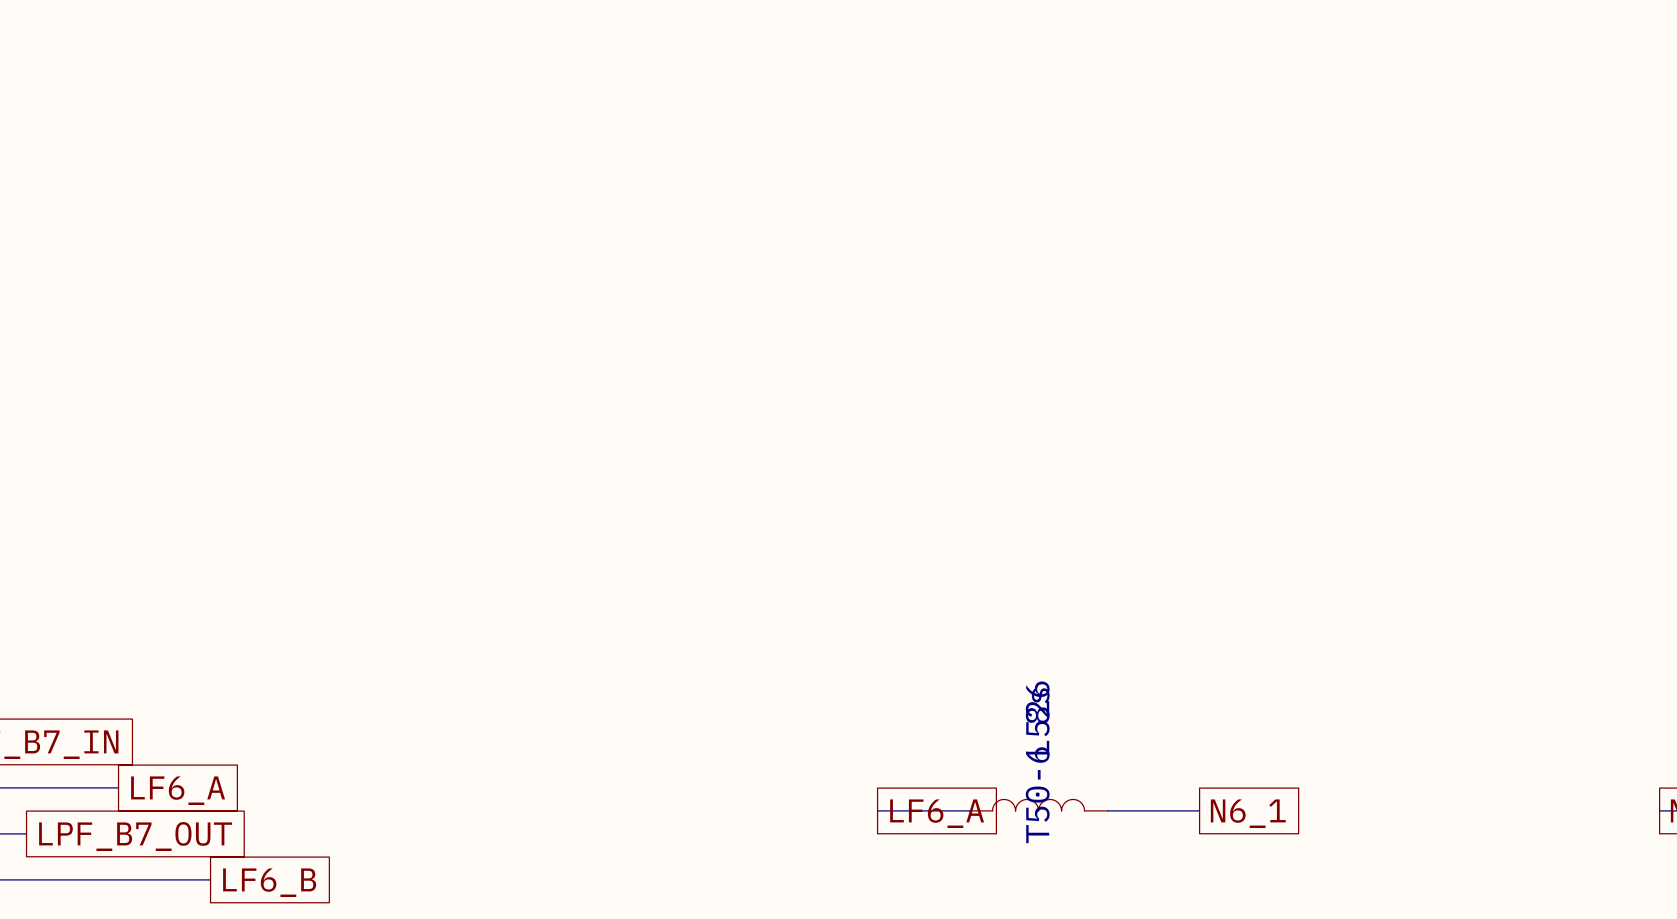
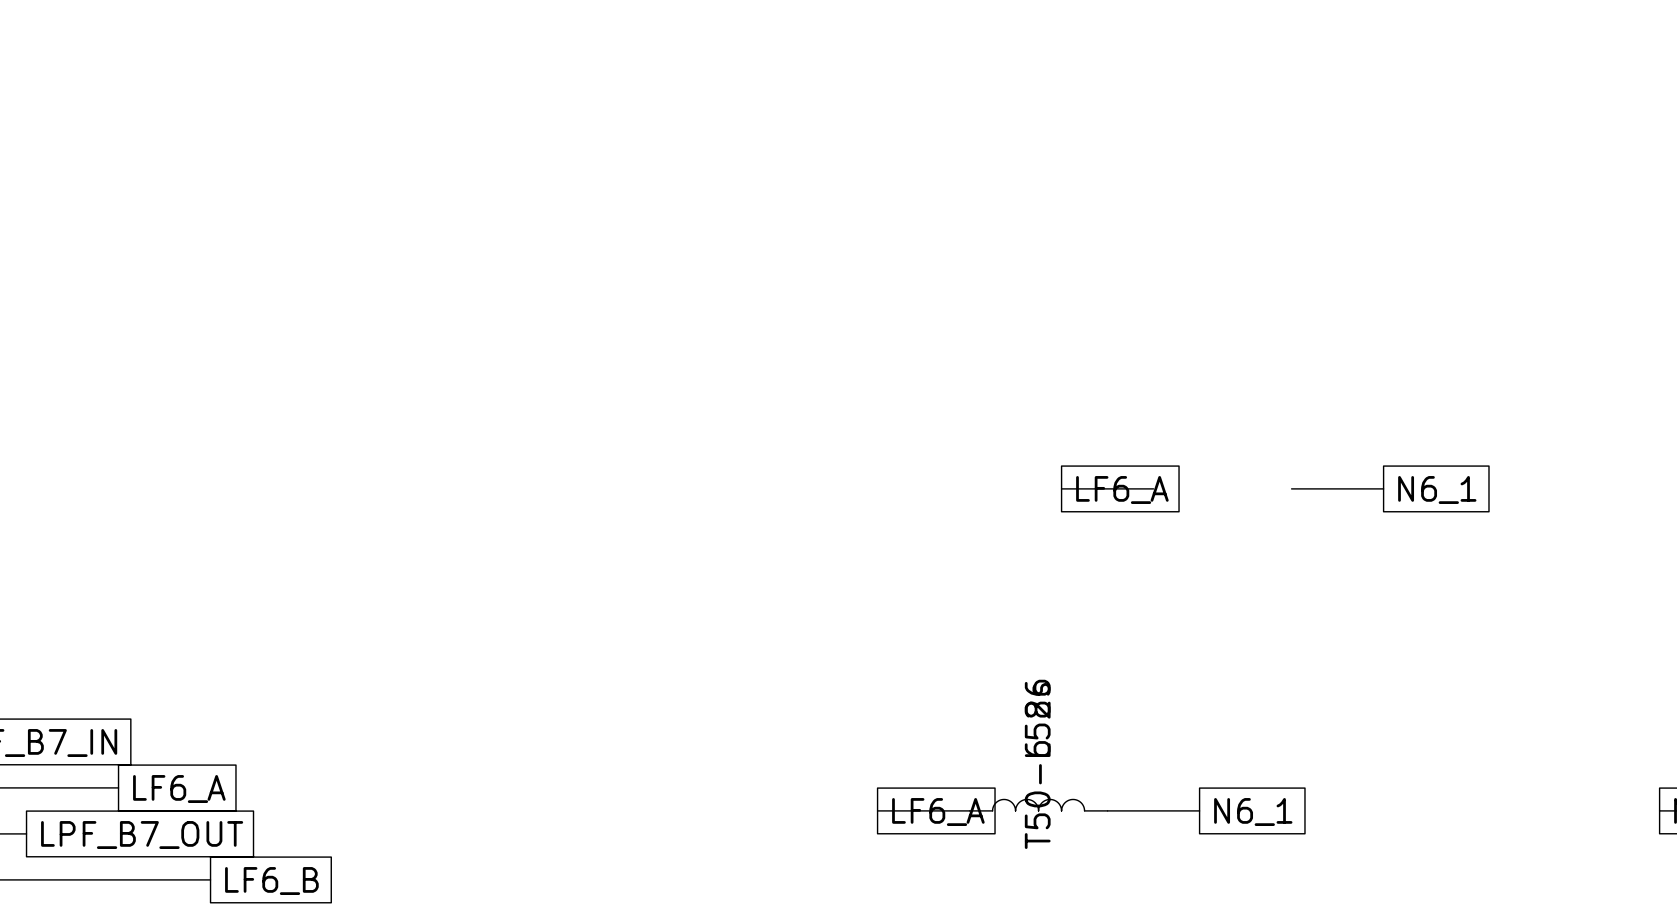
wire: none -> (1061, 488) (1153, 488)
wire: none -> (1291, 488) (1383, 488)
global label: none -> LF6_A (1122, 490)
global label: none -> N6_1 (1437, 490)

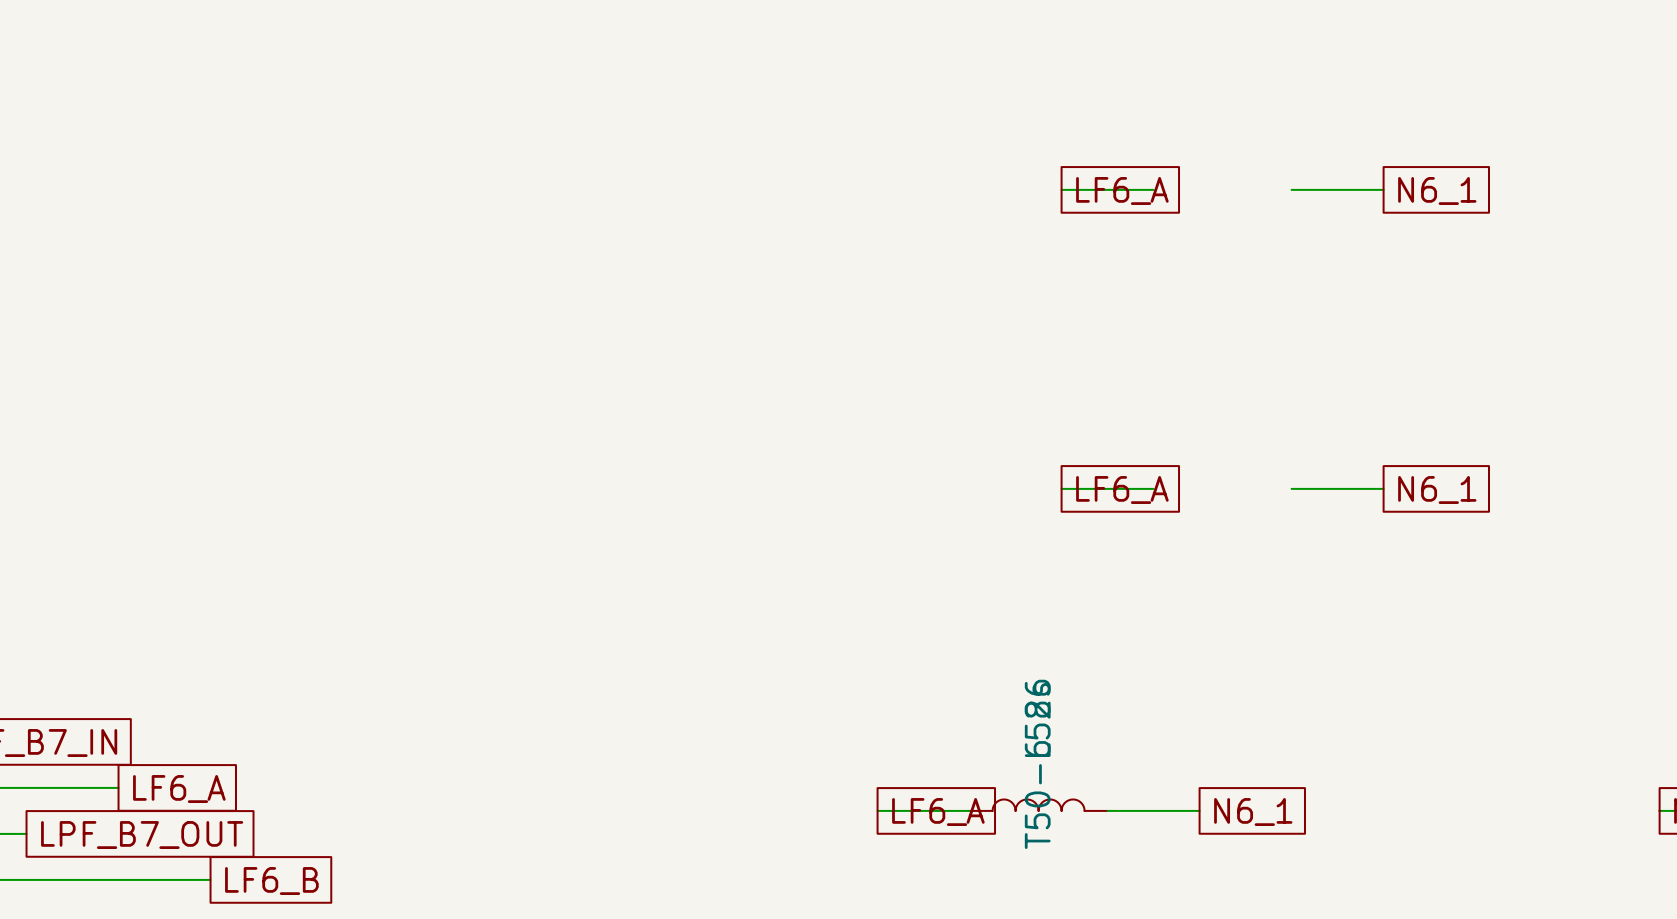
wire: none -> (1061, 189) (1153, 189)
wire: none -> (1291, 189) (1383, 189)
global label: none -> LF6_A (1122, 190)
global label: none -> N6_1 (1437, 190)

